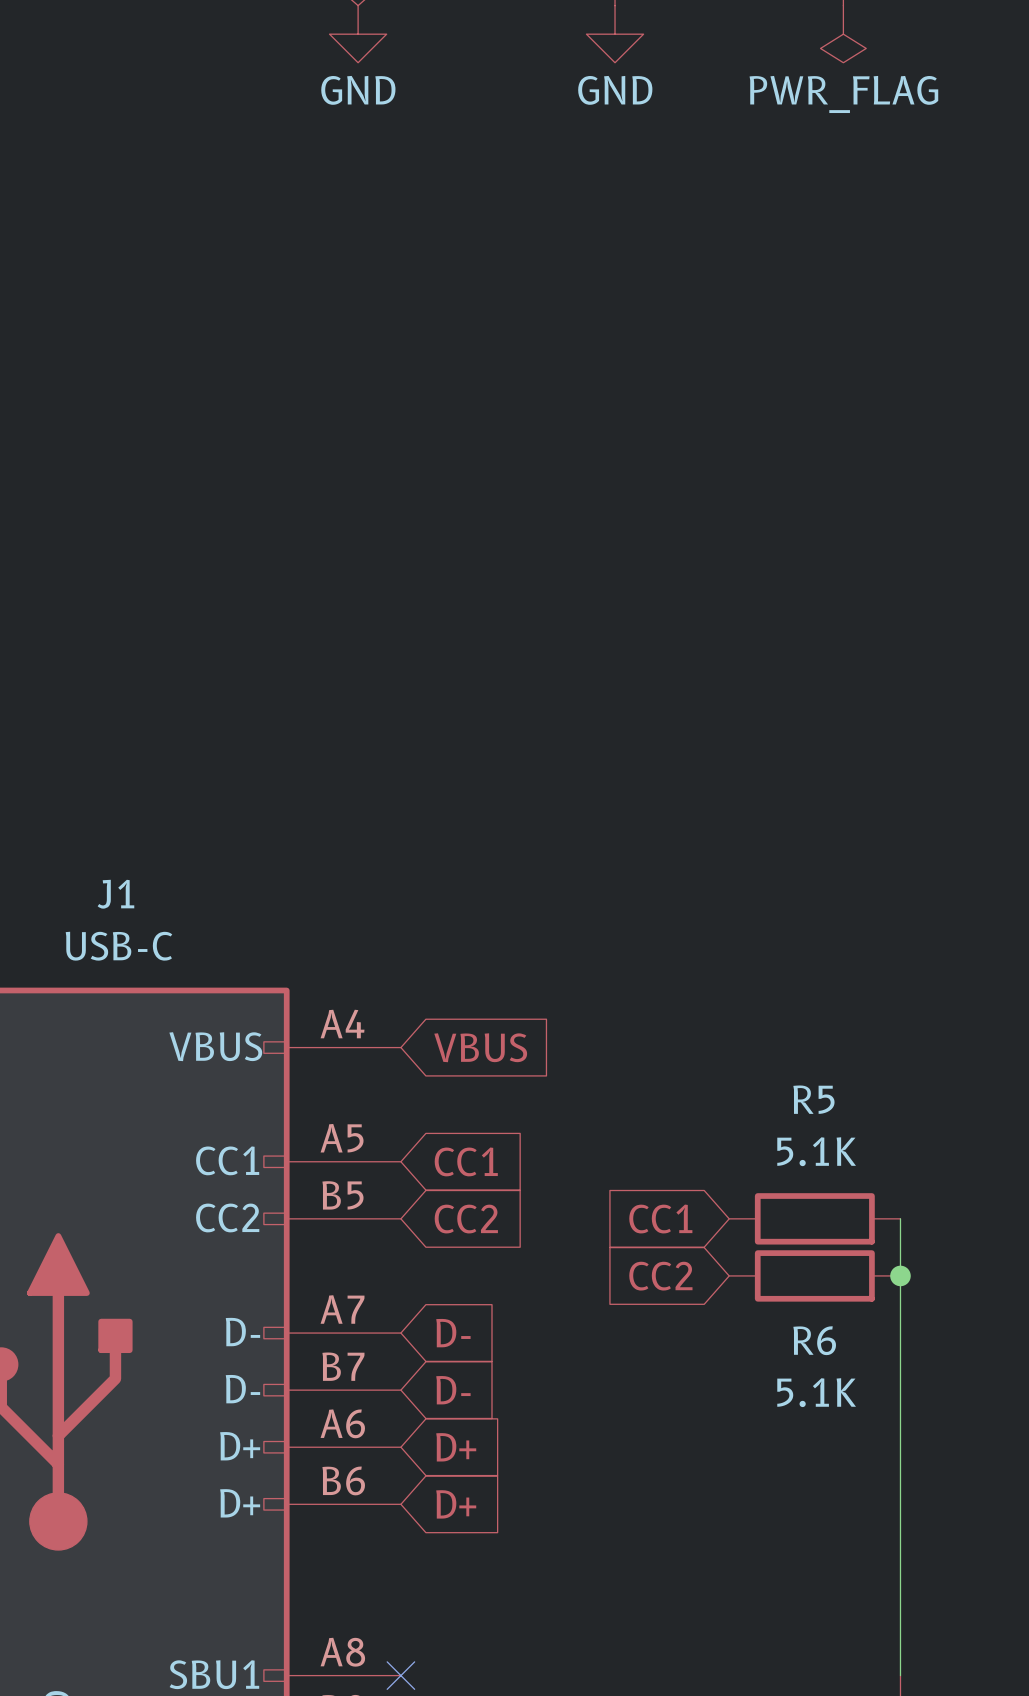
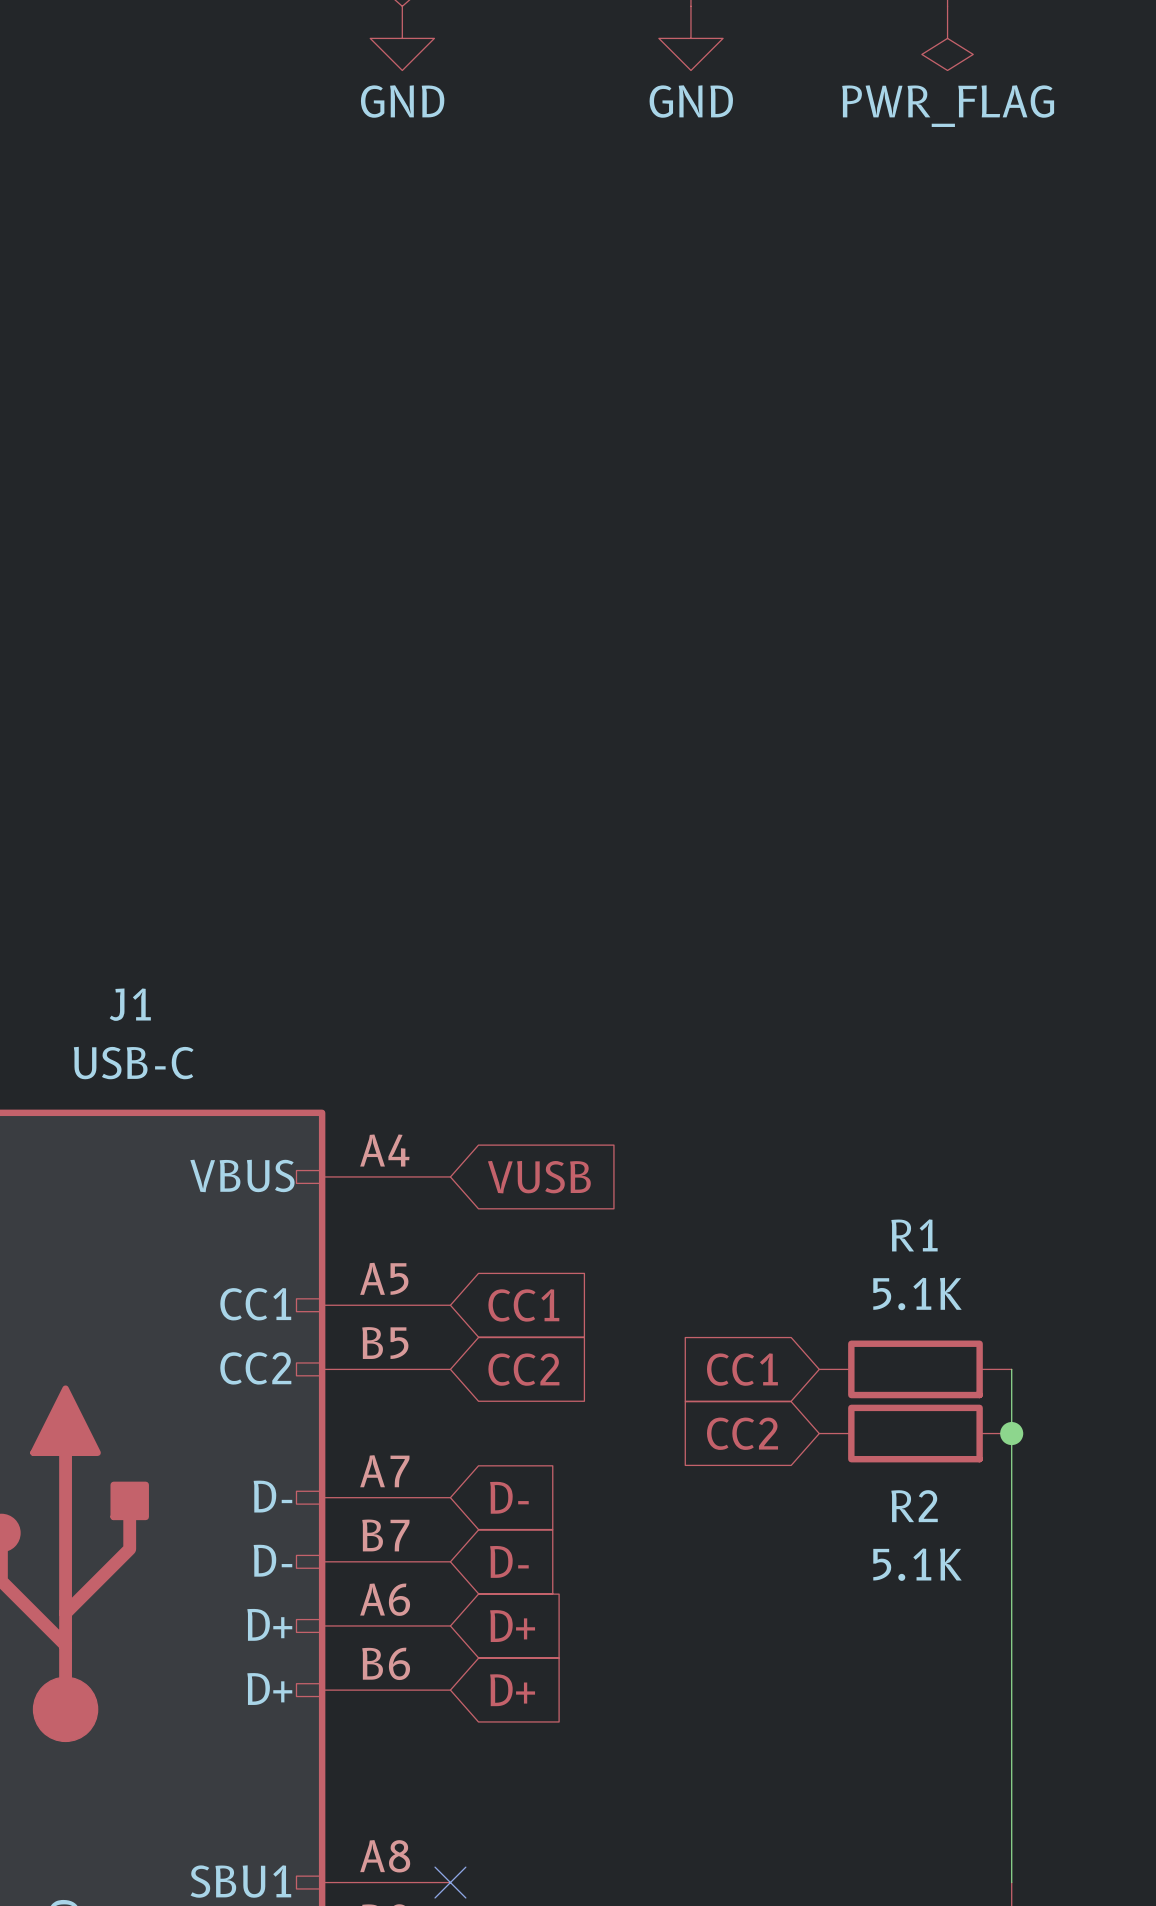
global label: VBUS (480, 1047) -> VUSB (539, 1177)
R5 name: R5 (813, 1099) -> R1 (914, 1235)
R6 name: R6 (814, 1340) -> R2 (914, 1506)

